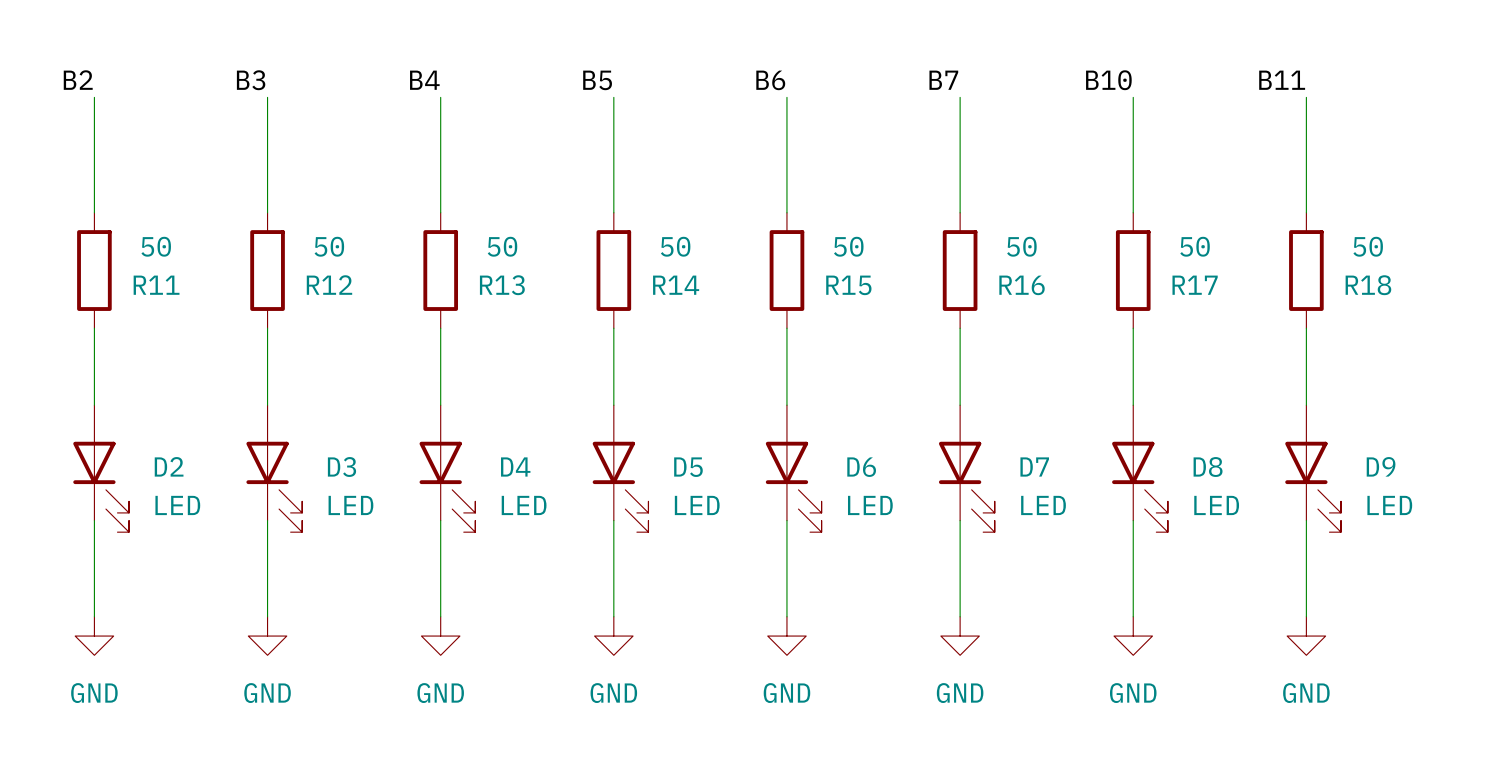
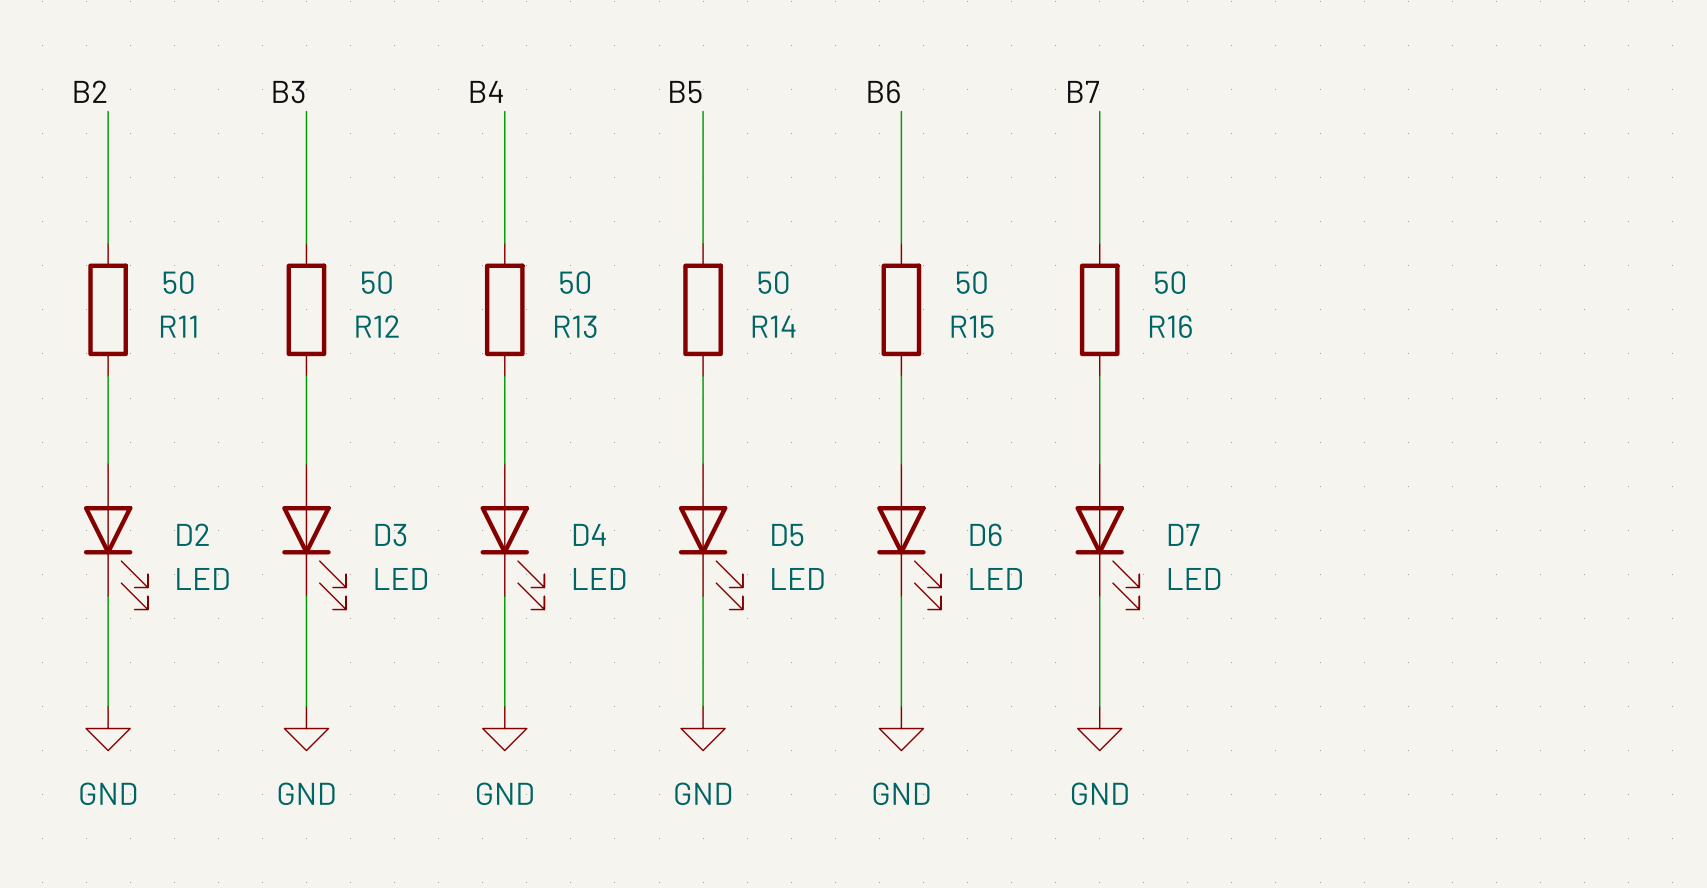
label: B10 (1108, 80) -> none
label: B11 (1282, 80) -> none
wire: (1133, 97) (1133, 212) -> none
wire: (1306, 97) (1306, 212) -> none
R17: 50 (1133, 270) -> none
R18: 50 (1306, 270) -> none
wire: (1133, 328) (1133, 405) -> none
wire: (1306, 328) (1306, 405) -> none
D8: LED (1139, 468) -> none
D9: LED (1313, 468) -> none
wire: (1133, 520) (1133, 616) -> none
wire: (1306, 520) (1306, 616) -> none
power symbol: GND (1133, 636) -> none
power symbol: GND (1306, 636) -> none

